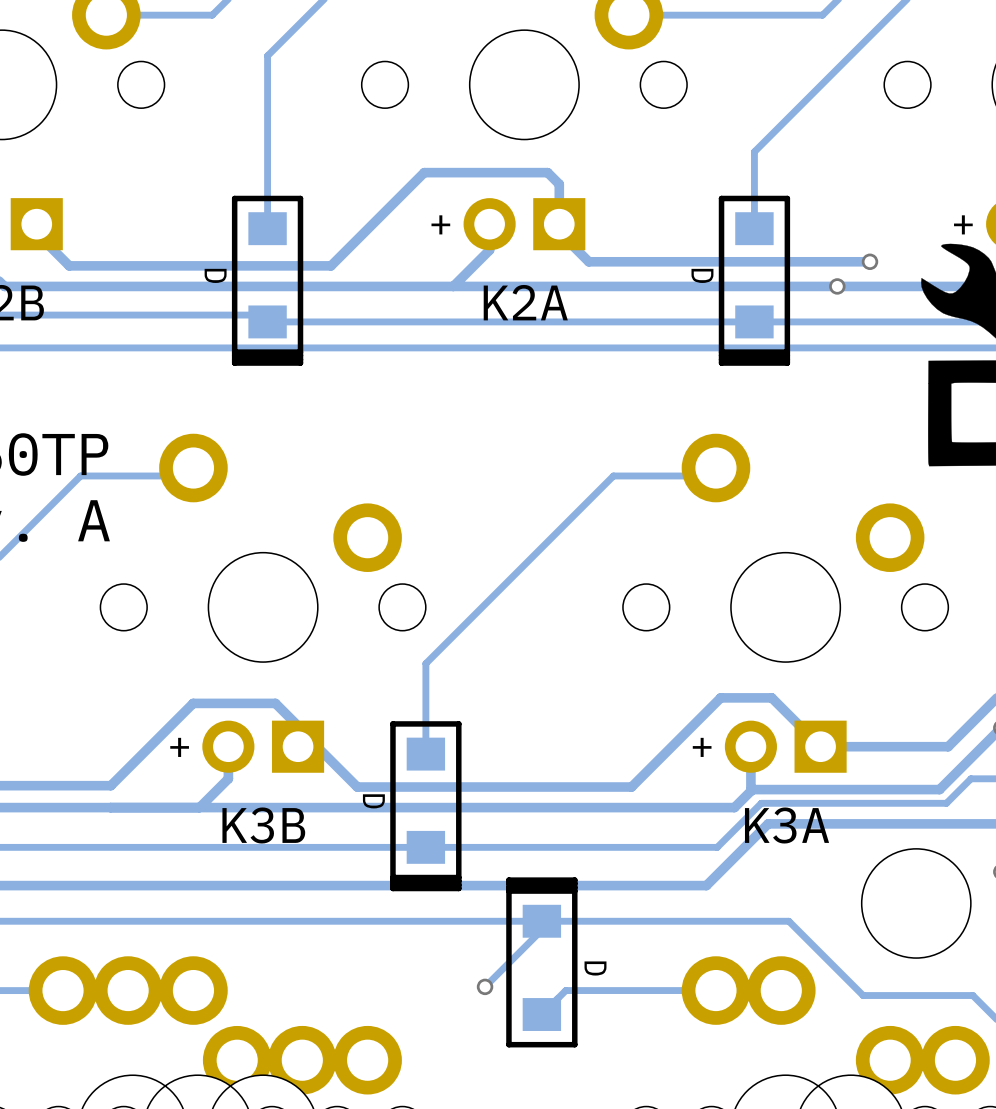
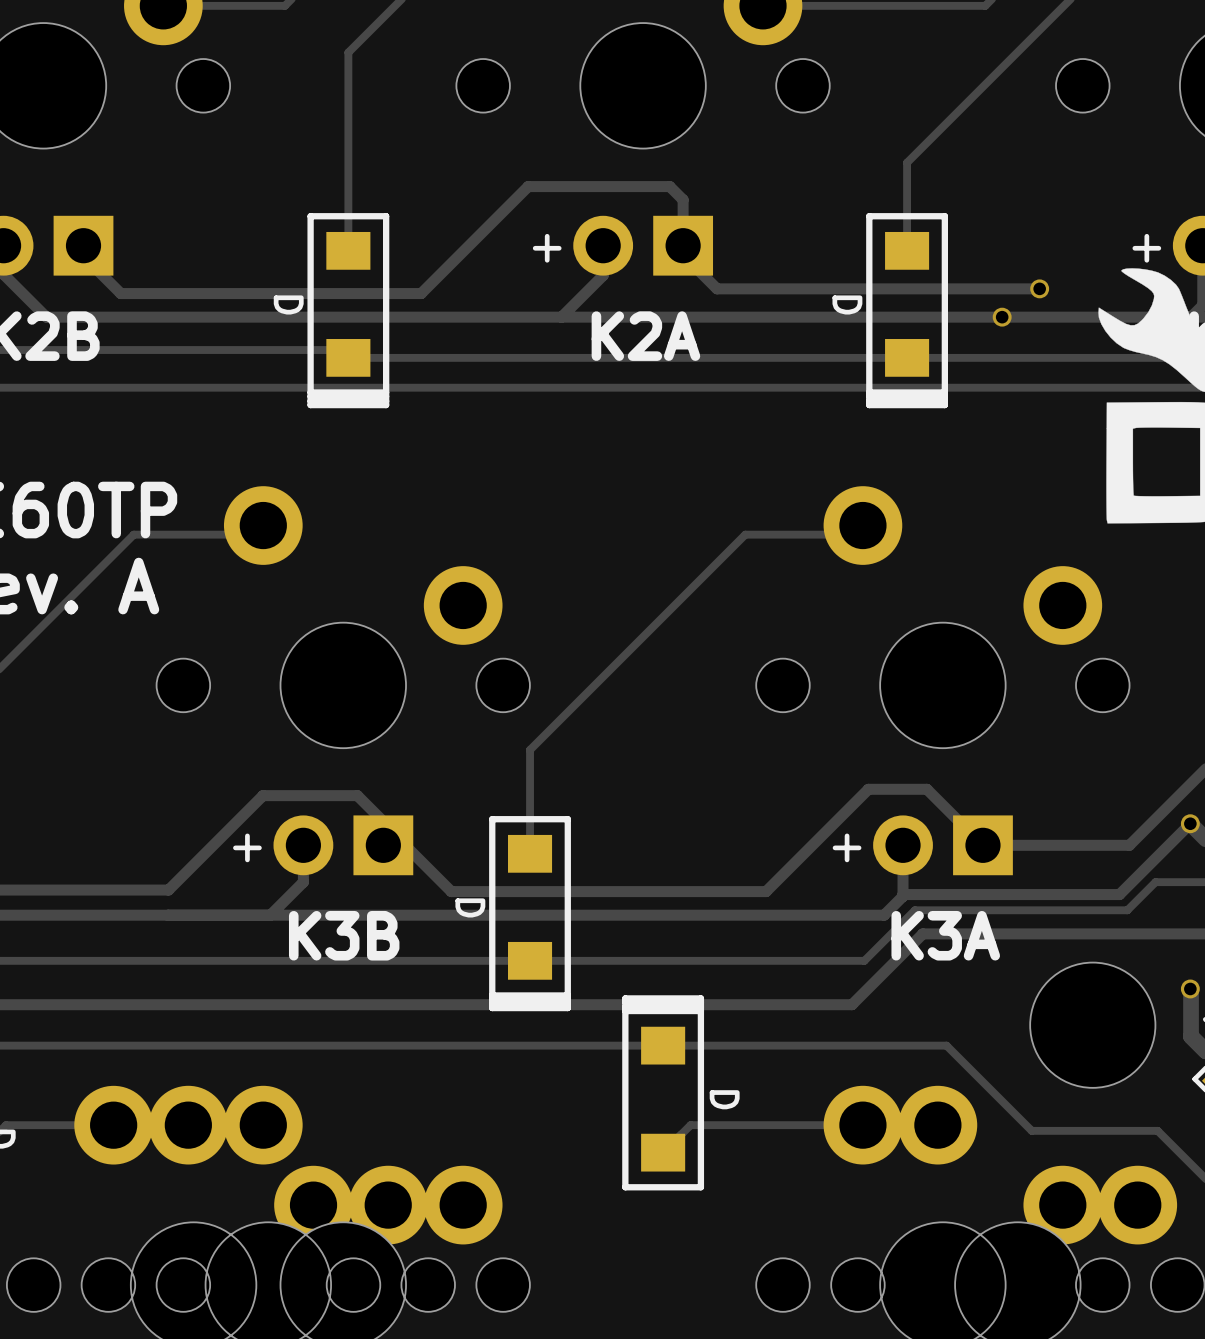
track: (541, 921) (541, 930) (485, 986) -> none
via: (485, 986) -> none

